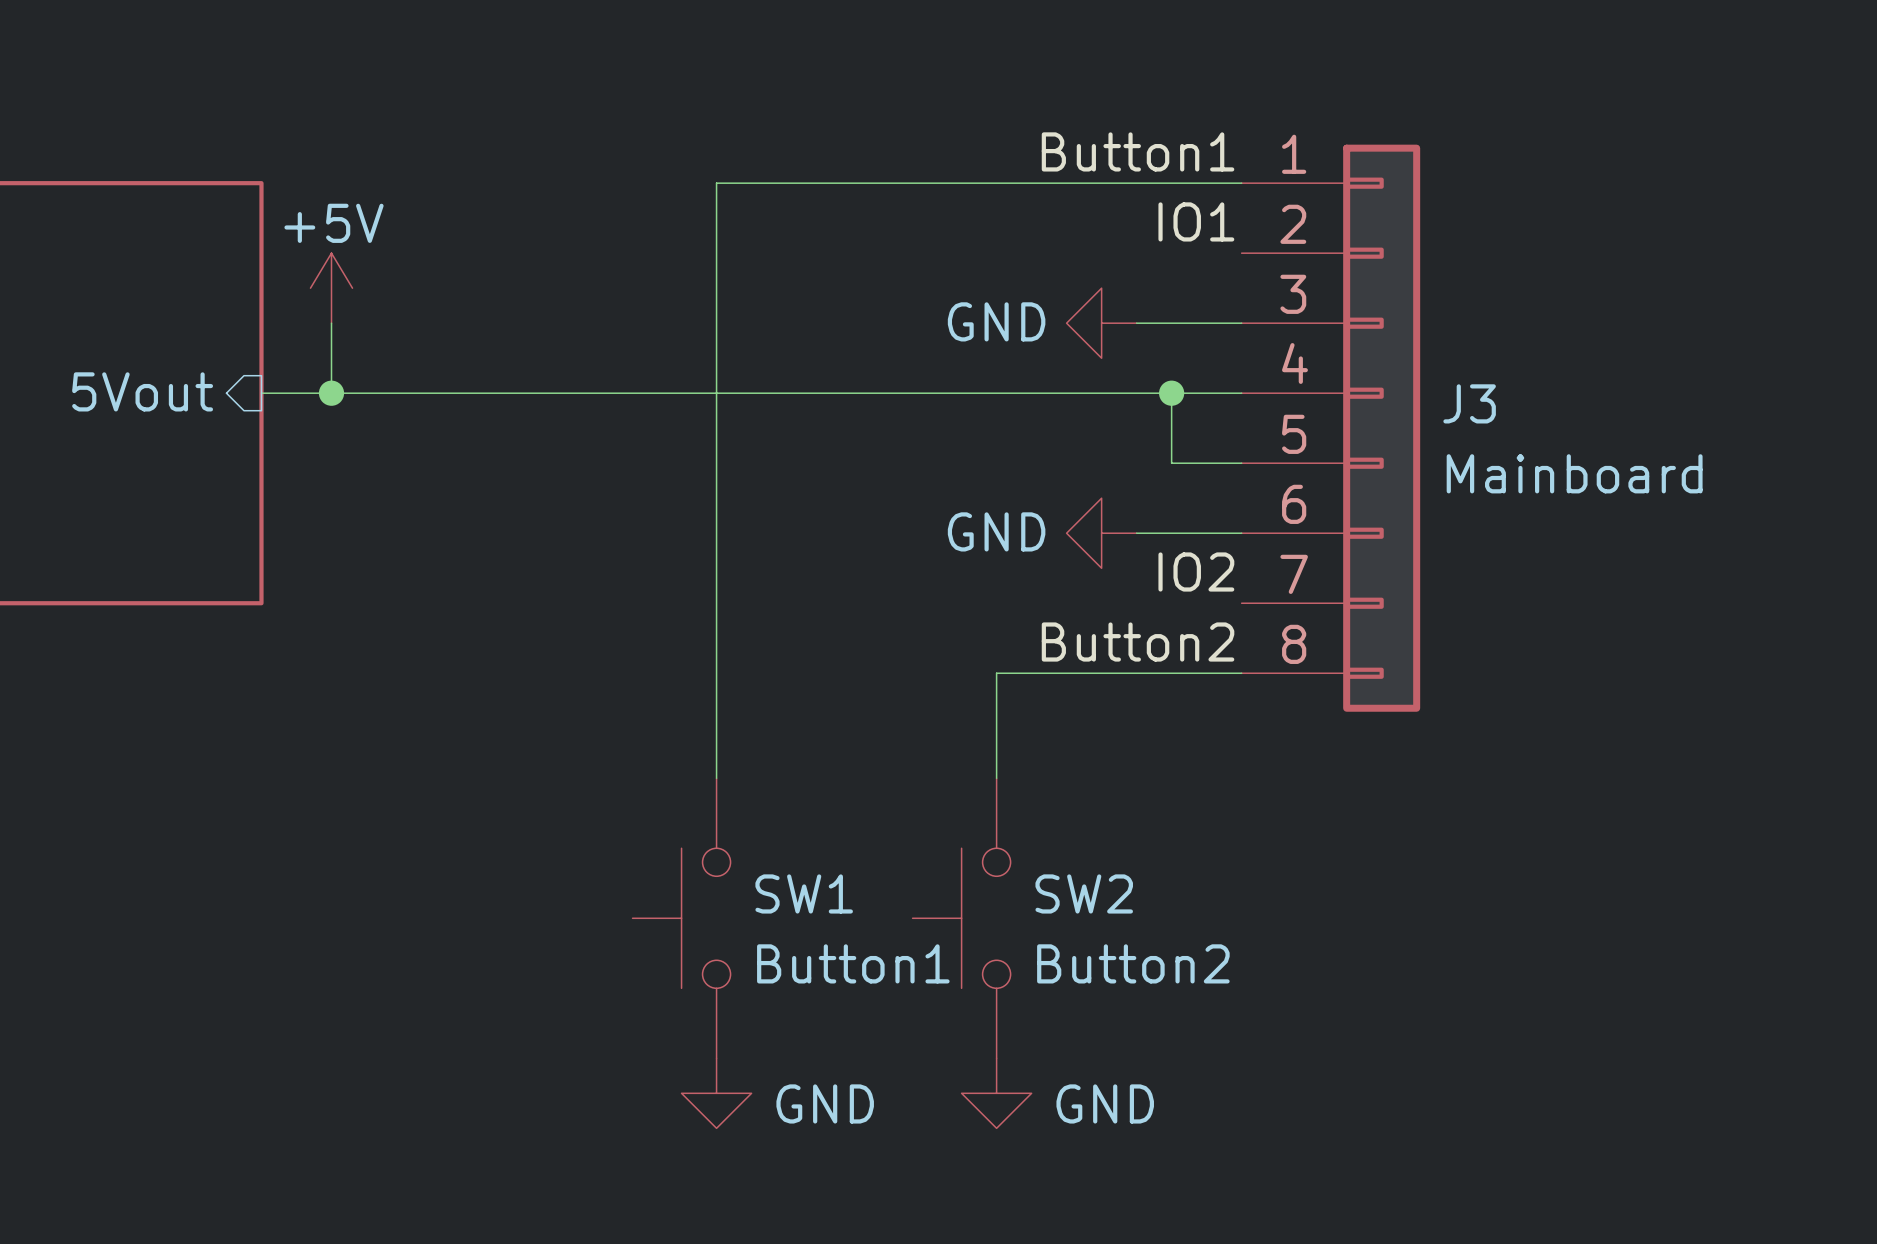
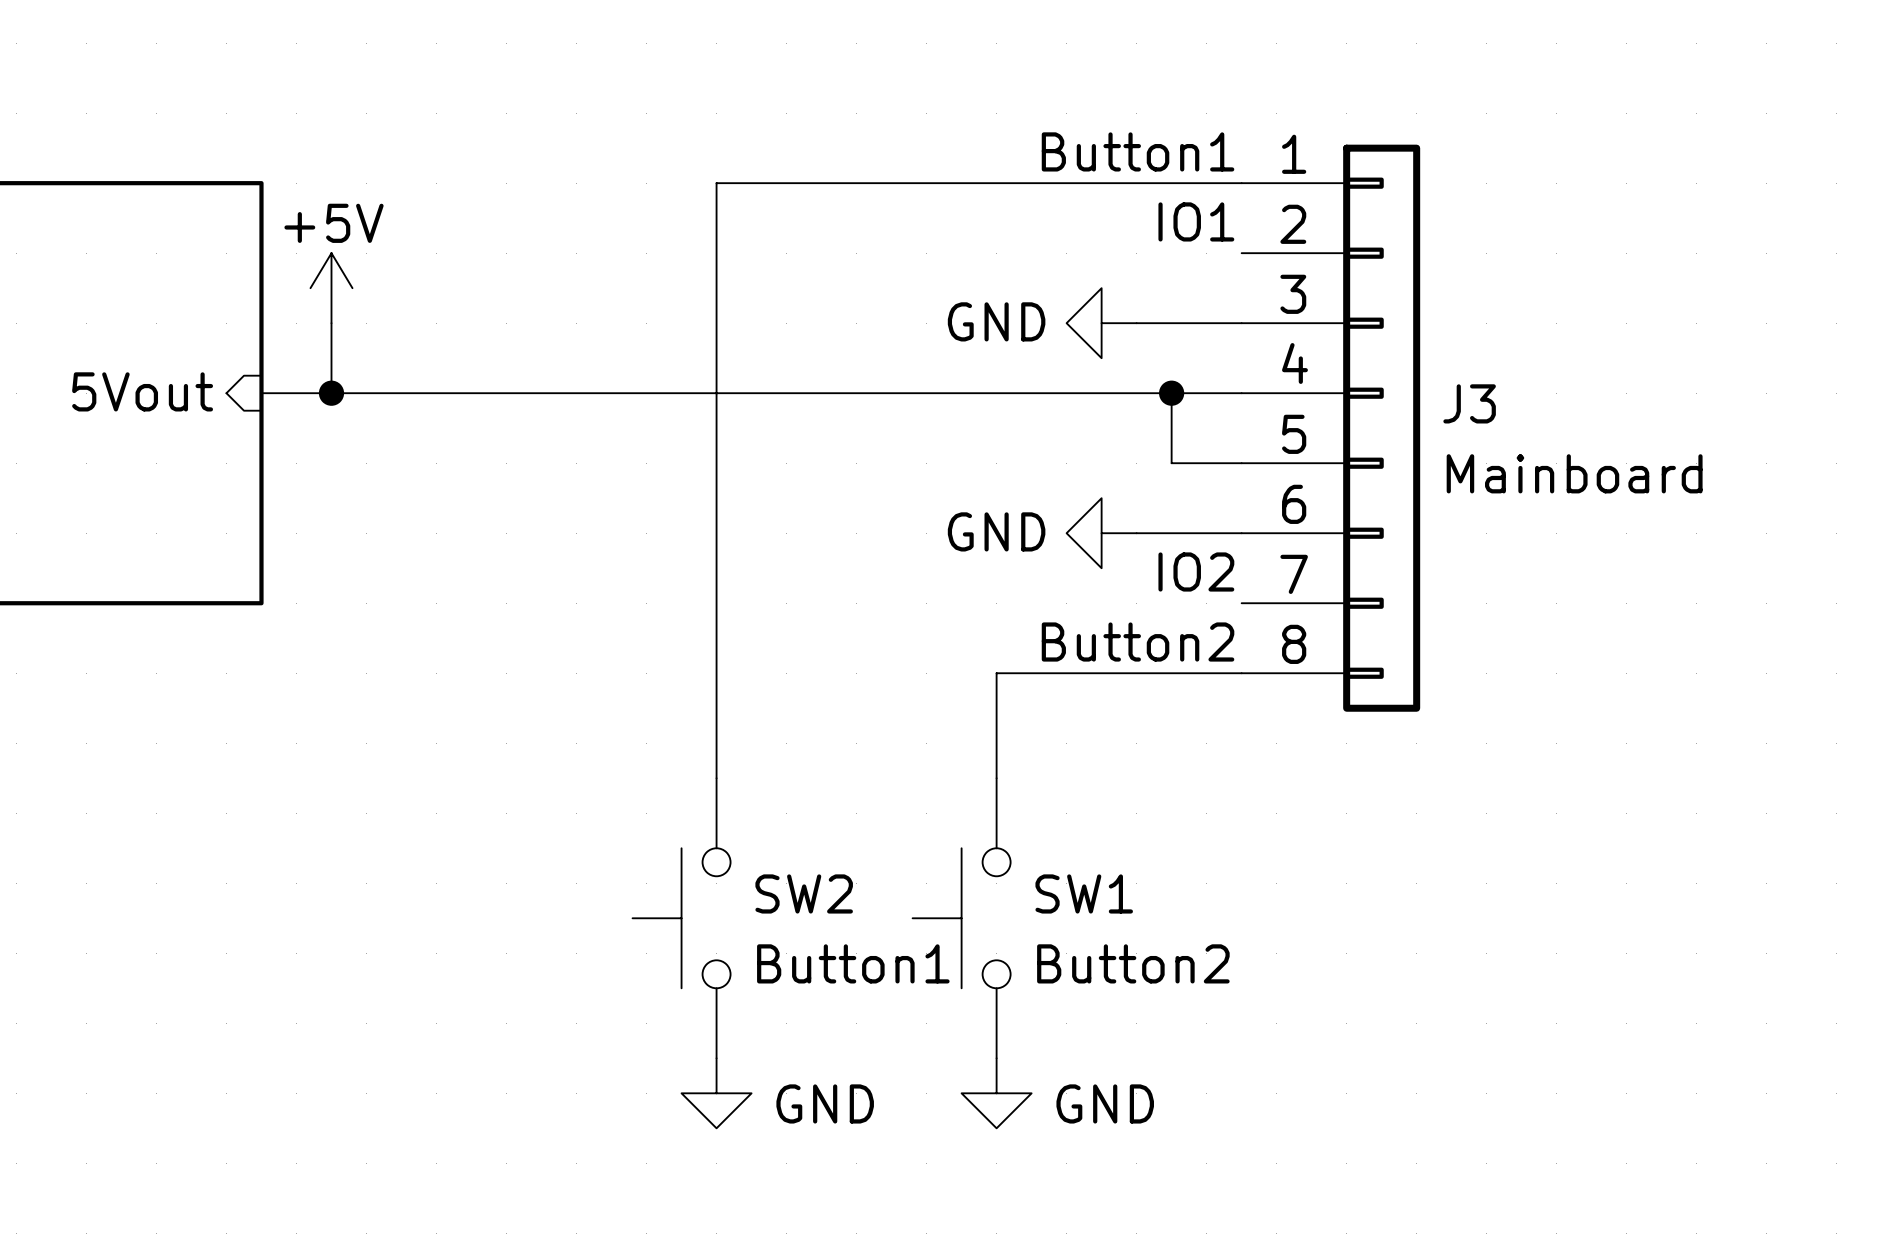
SW1 name: SW1 (804, 893) -> SW2 (804, 893)
SW2 name: SW2 (1084, 893) -> SW1 (1084, 893)

